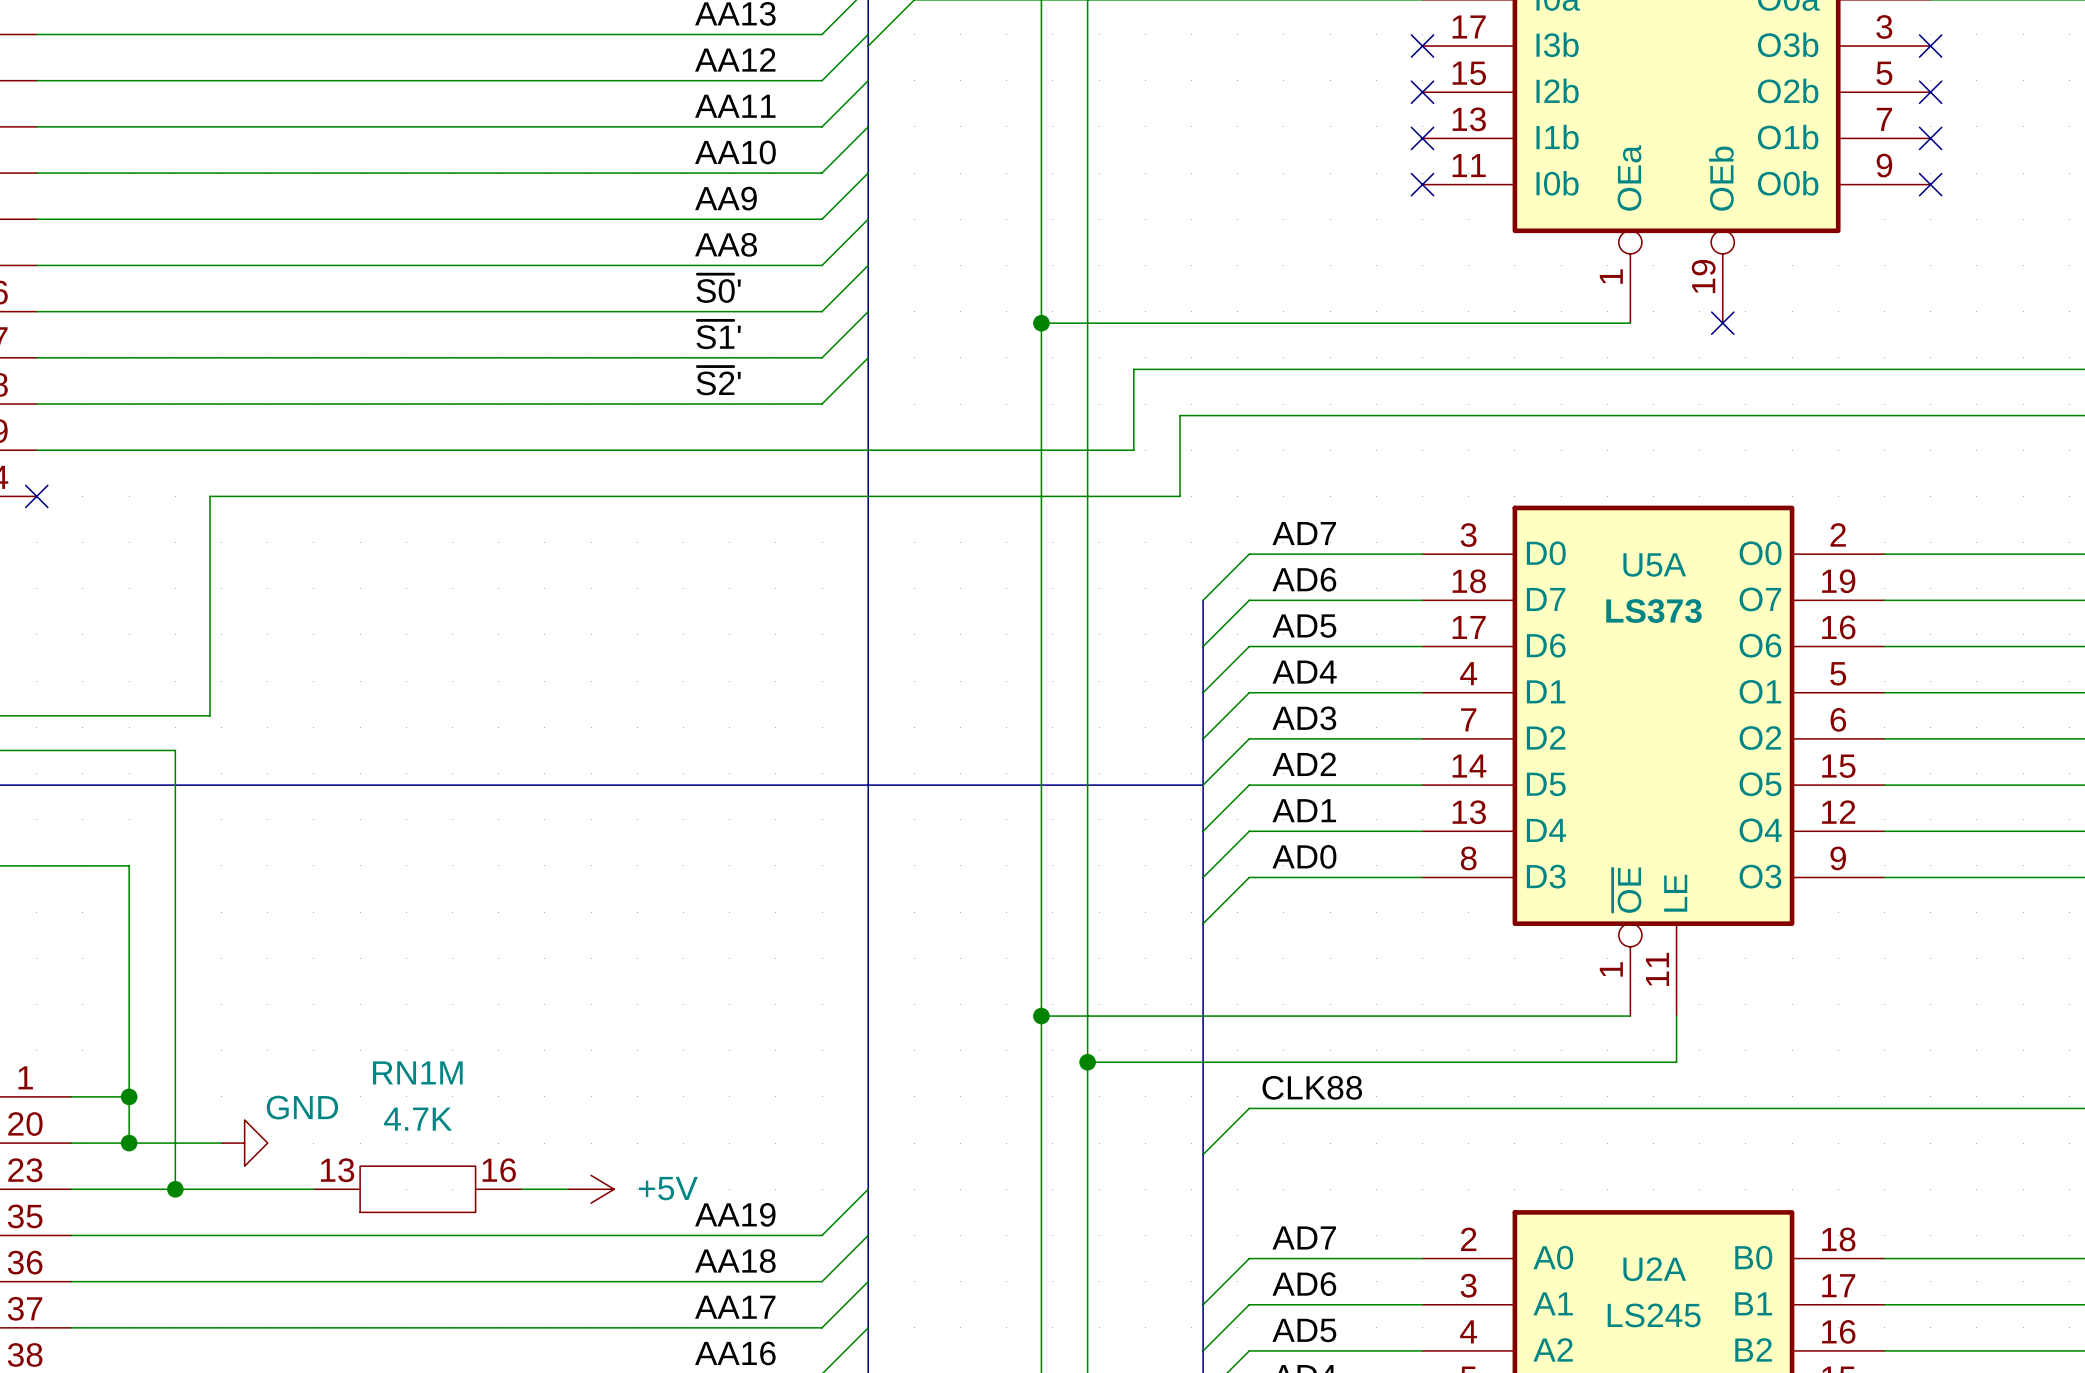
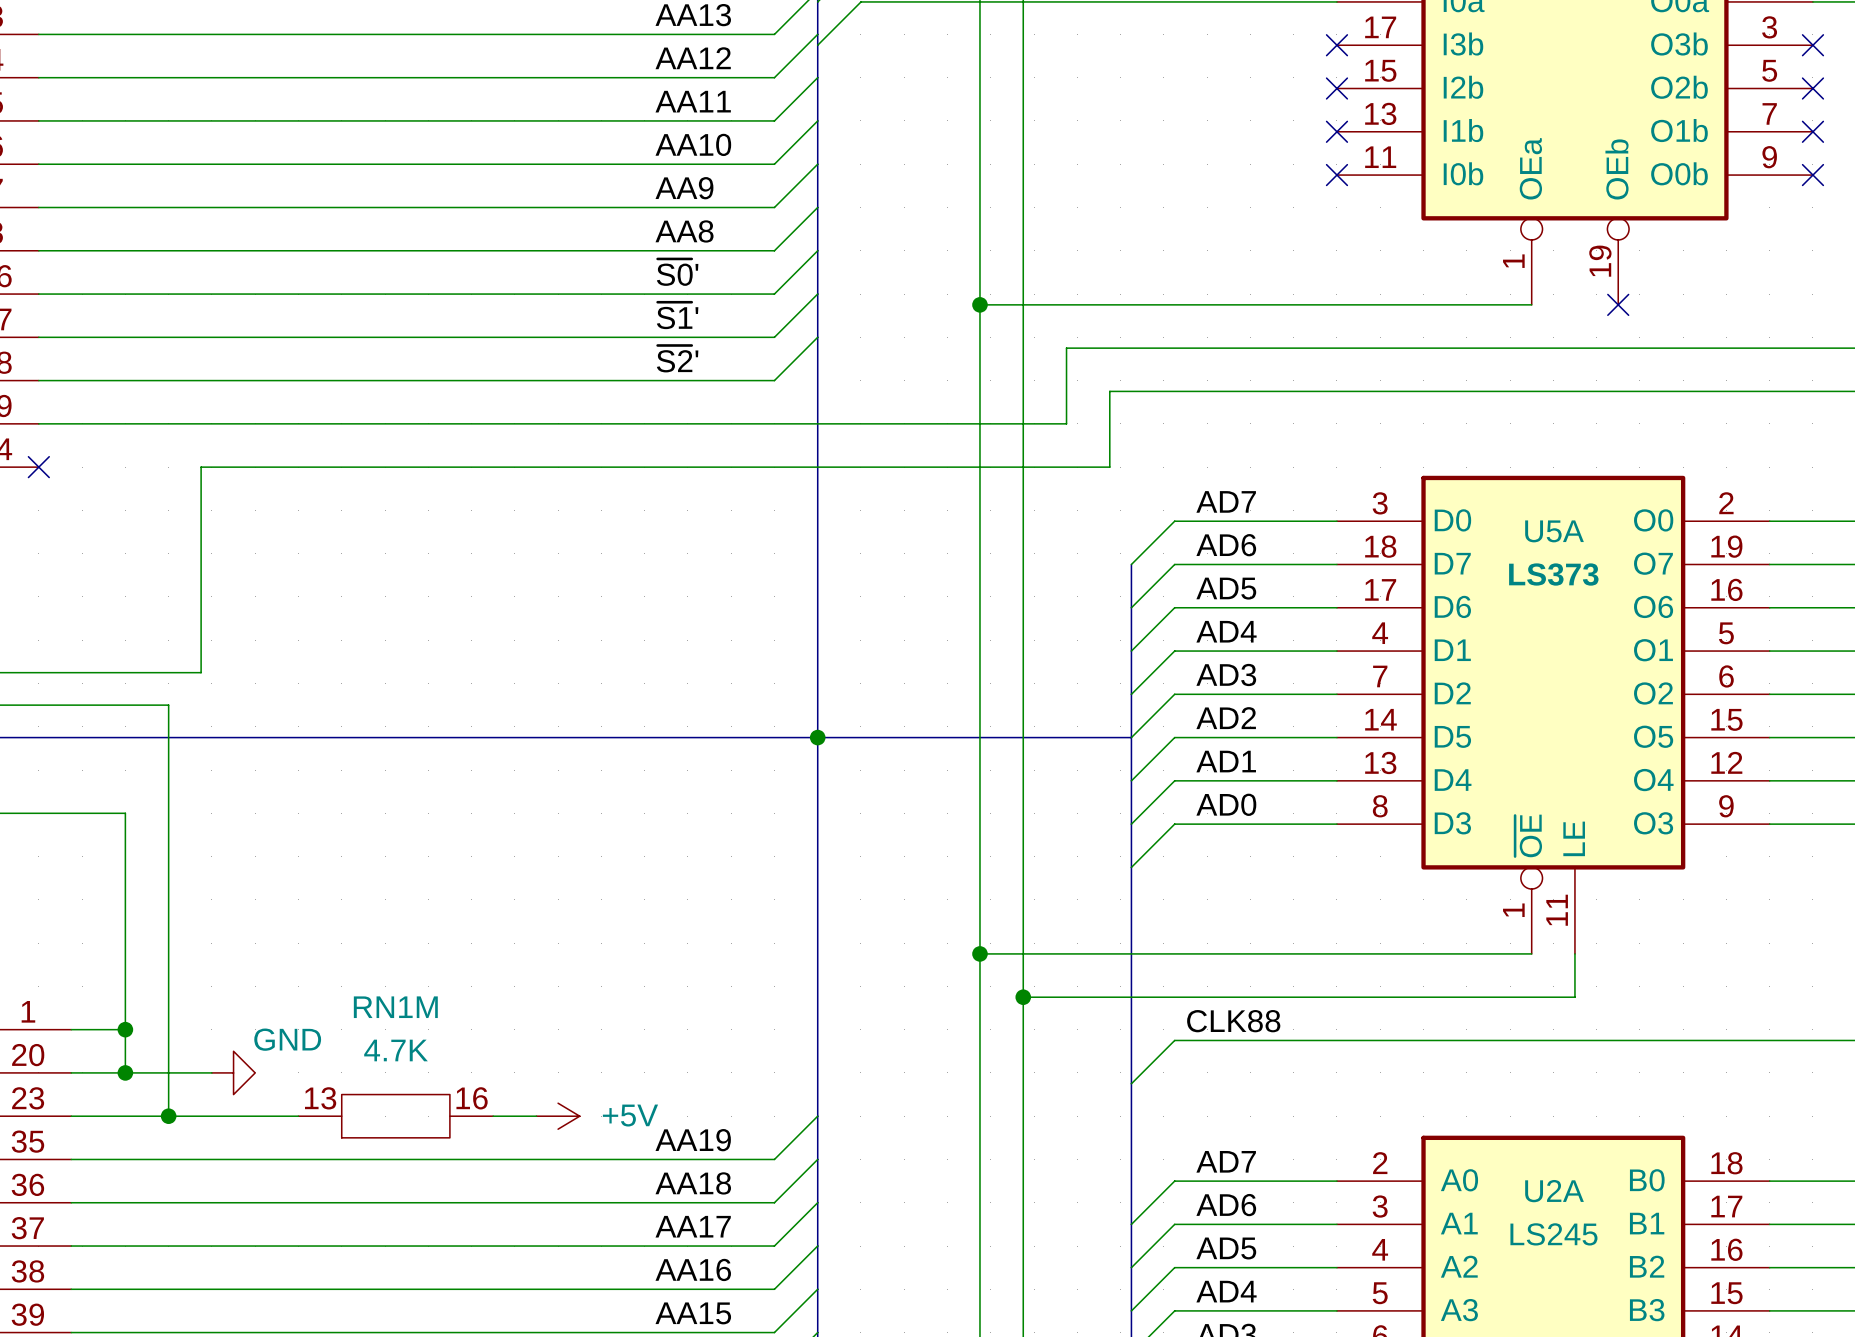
junction: none -> (817, 737)

